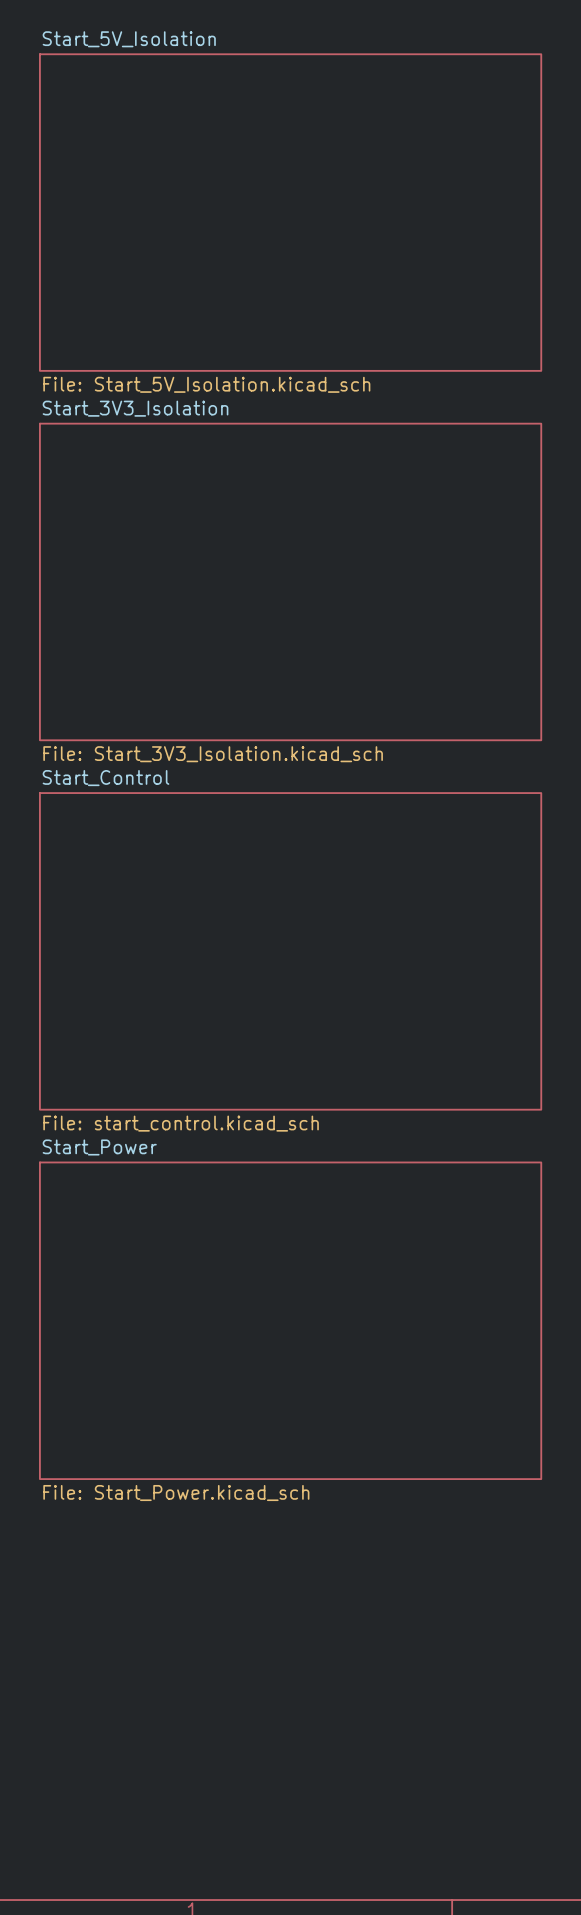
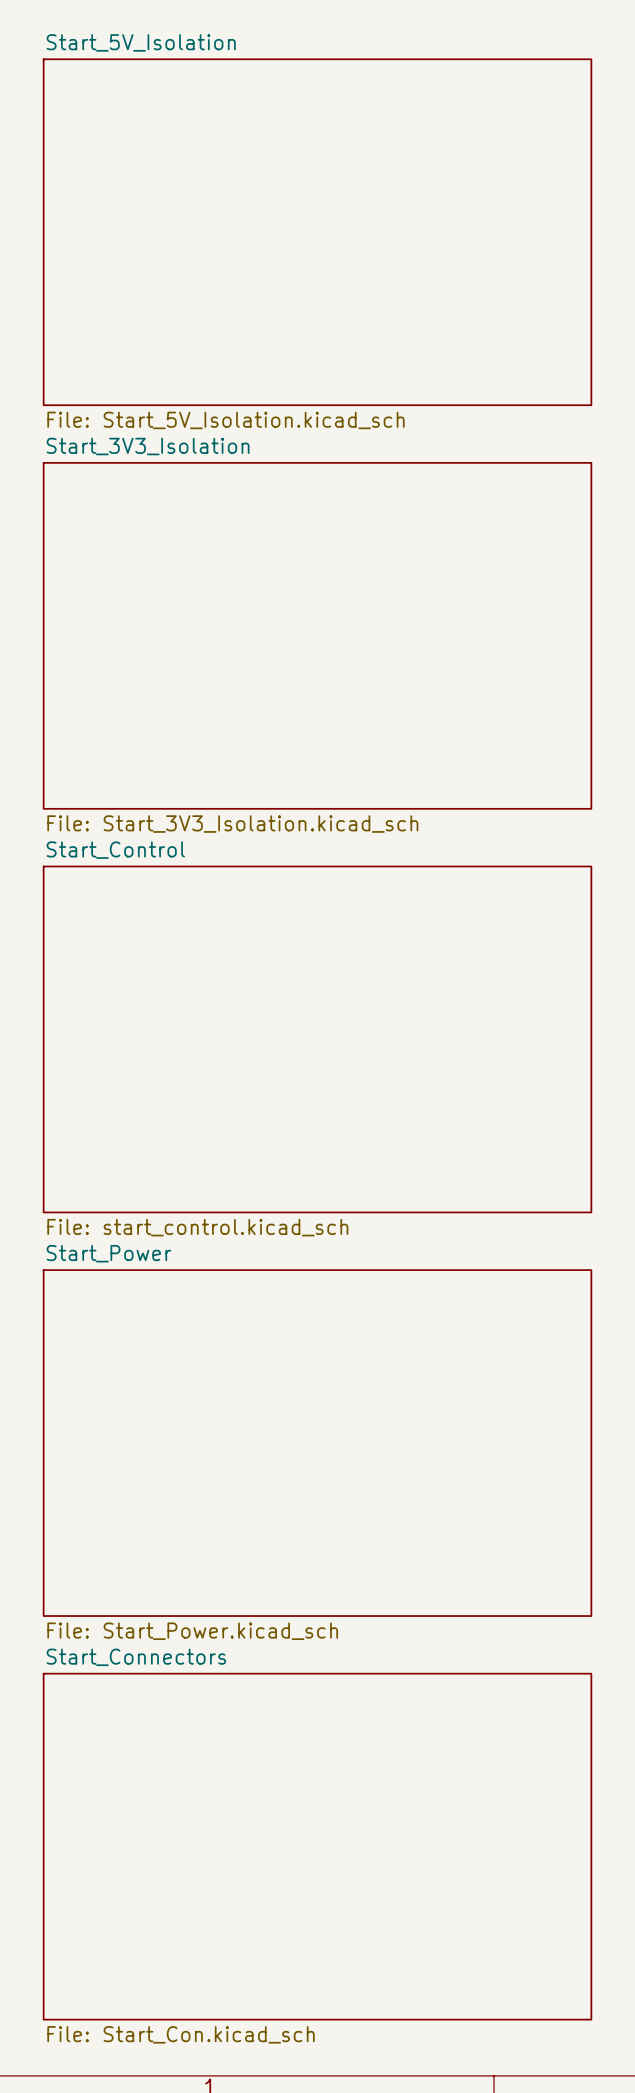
sheet Start_Connectors: none -> File: Start_Con.kicad_sch (317, 1846)

